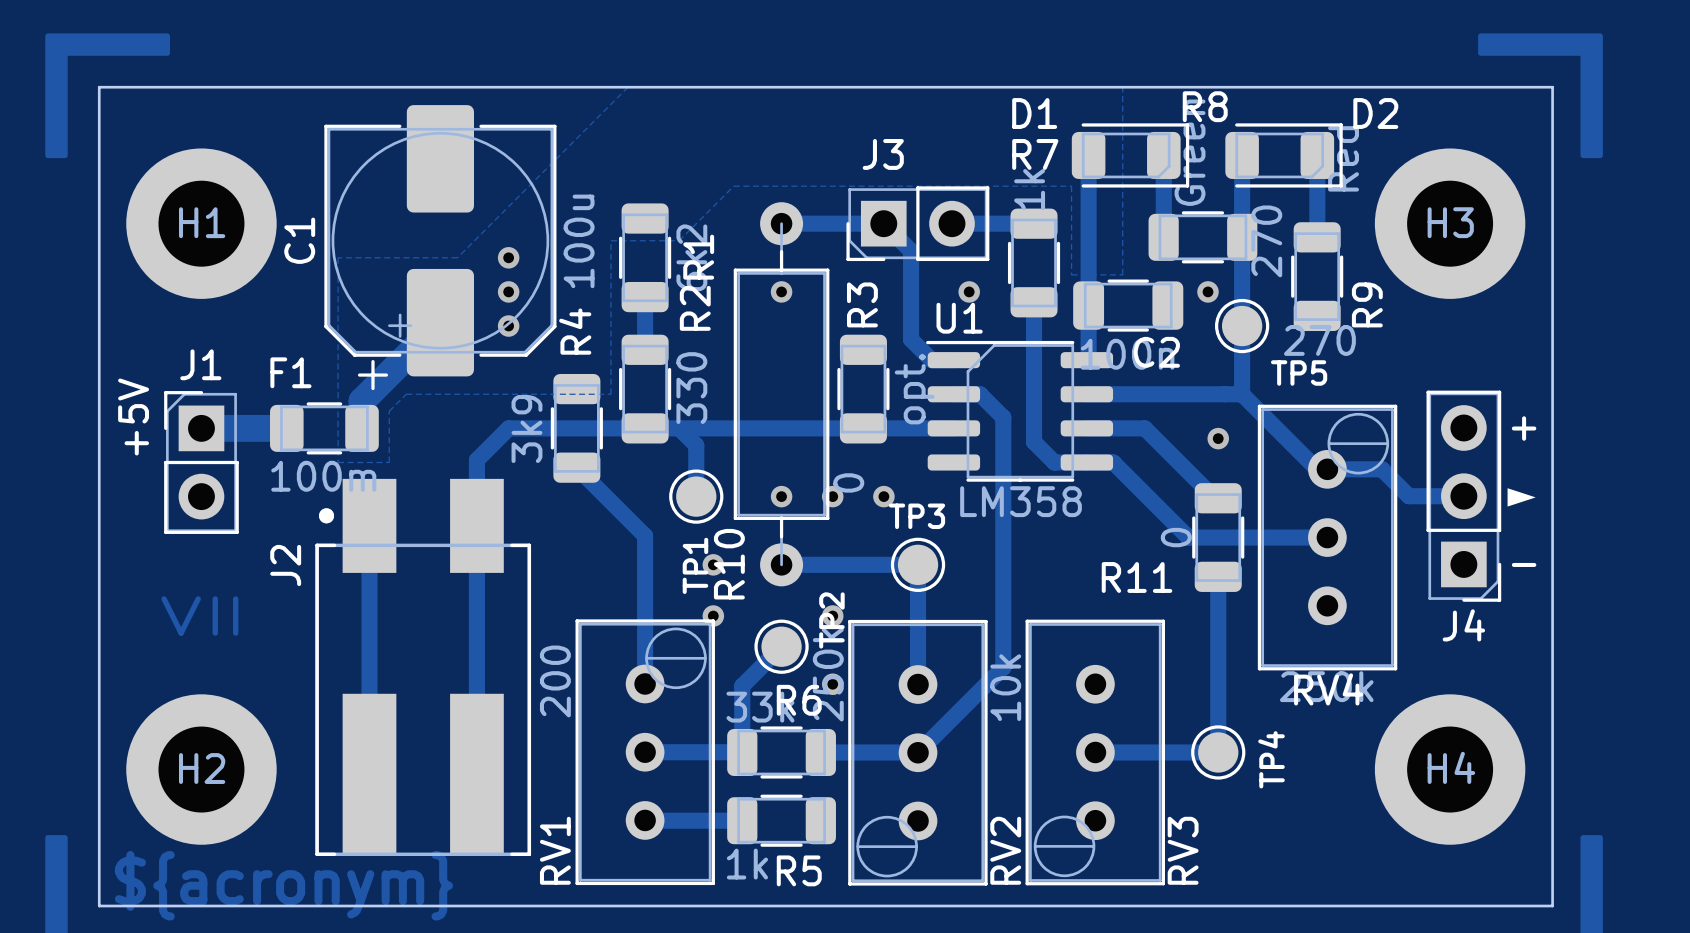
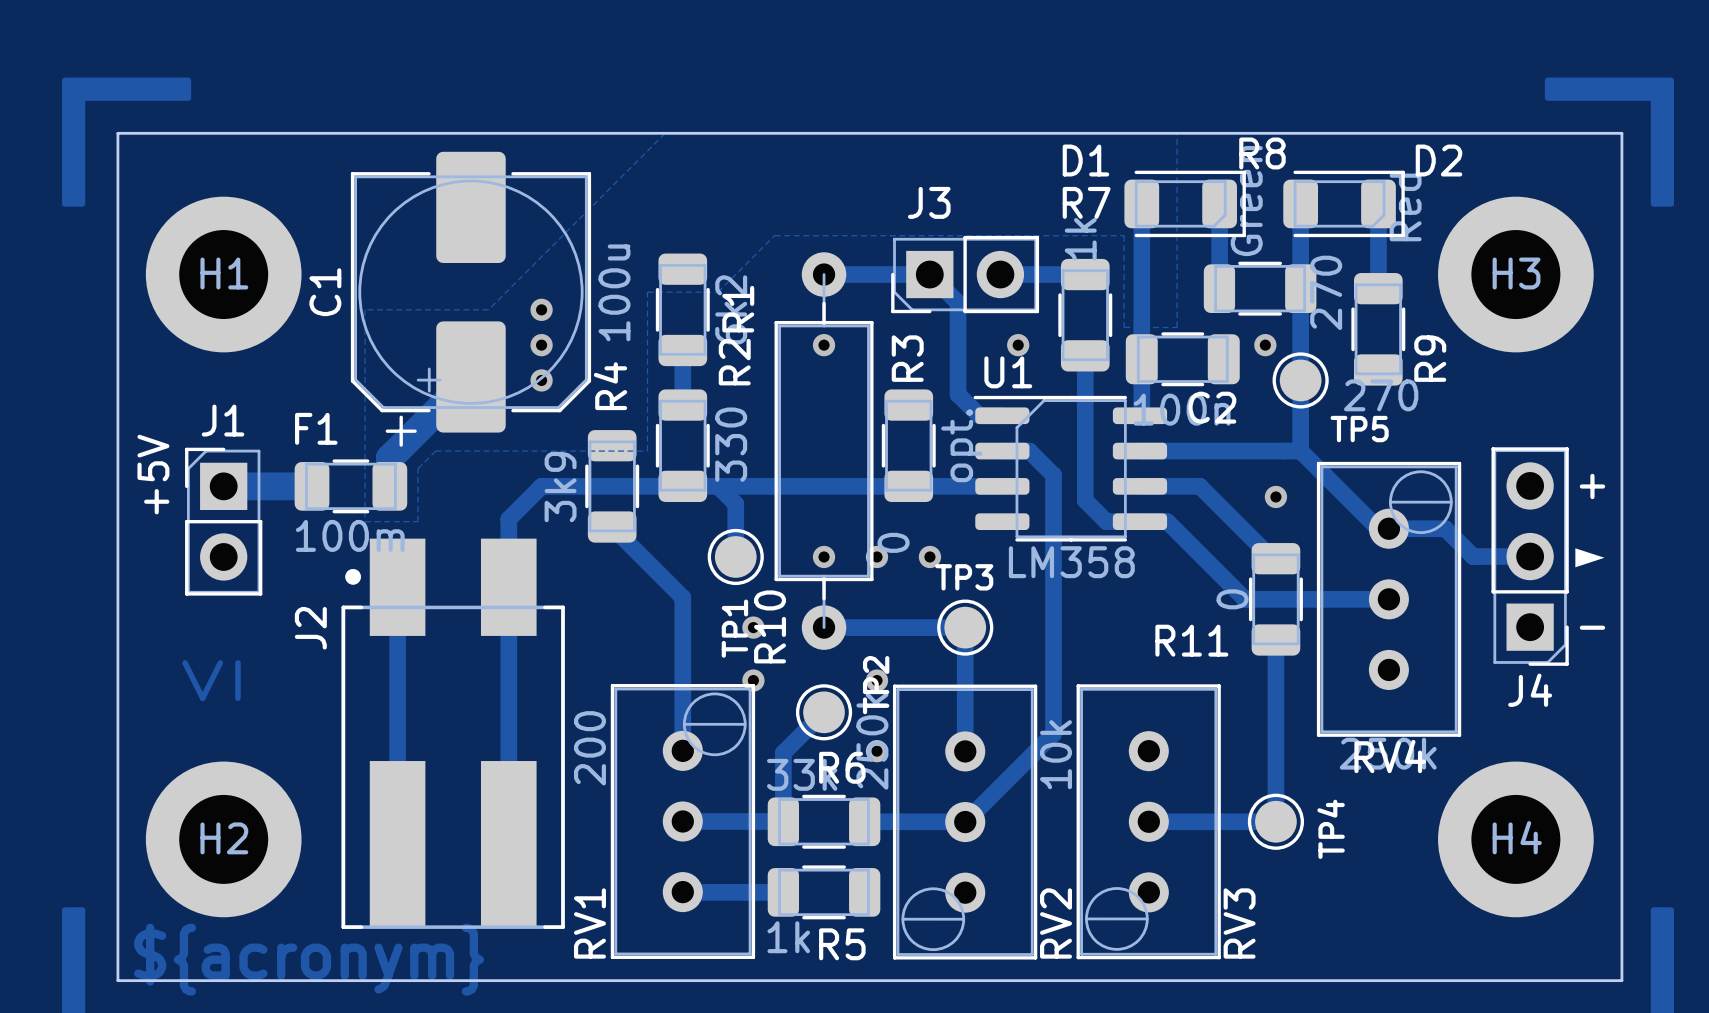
track: (235, 598) (235, 633) -> none

